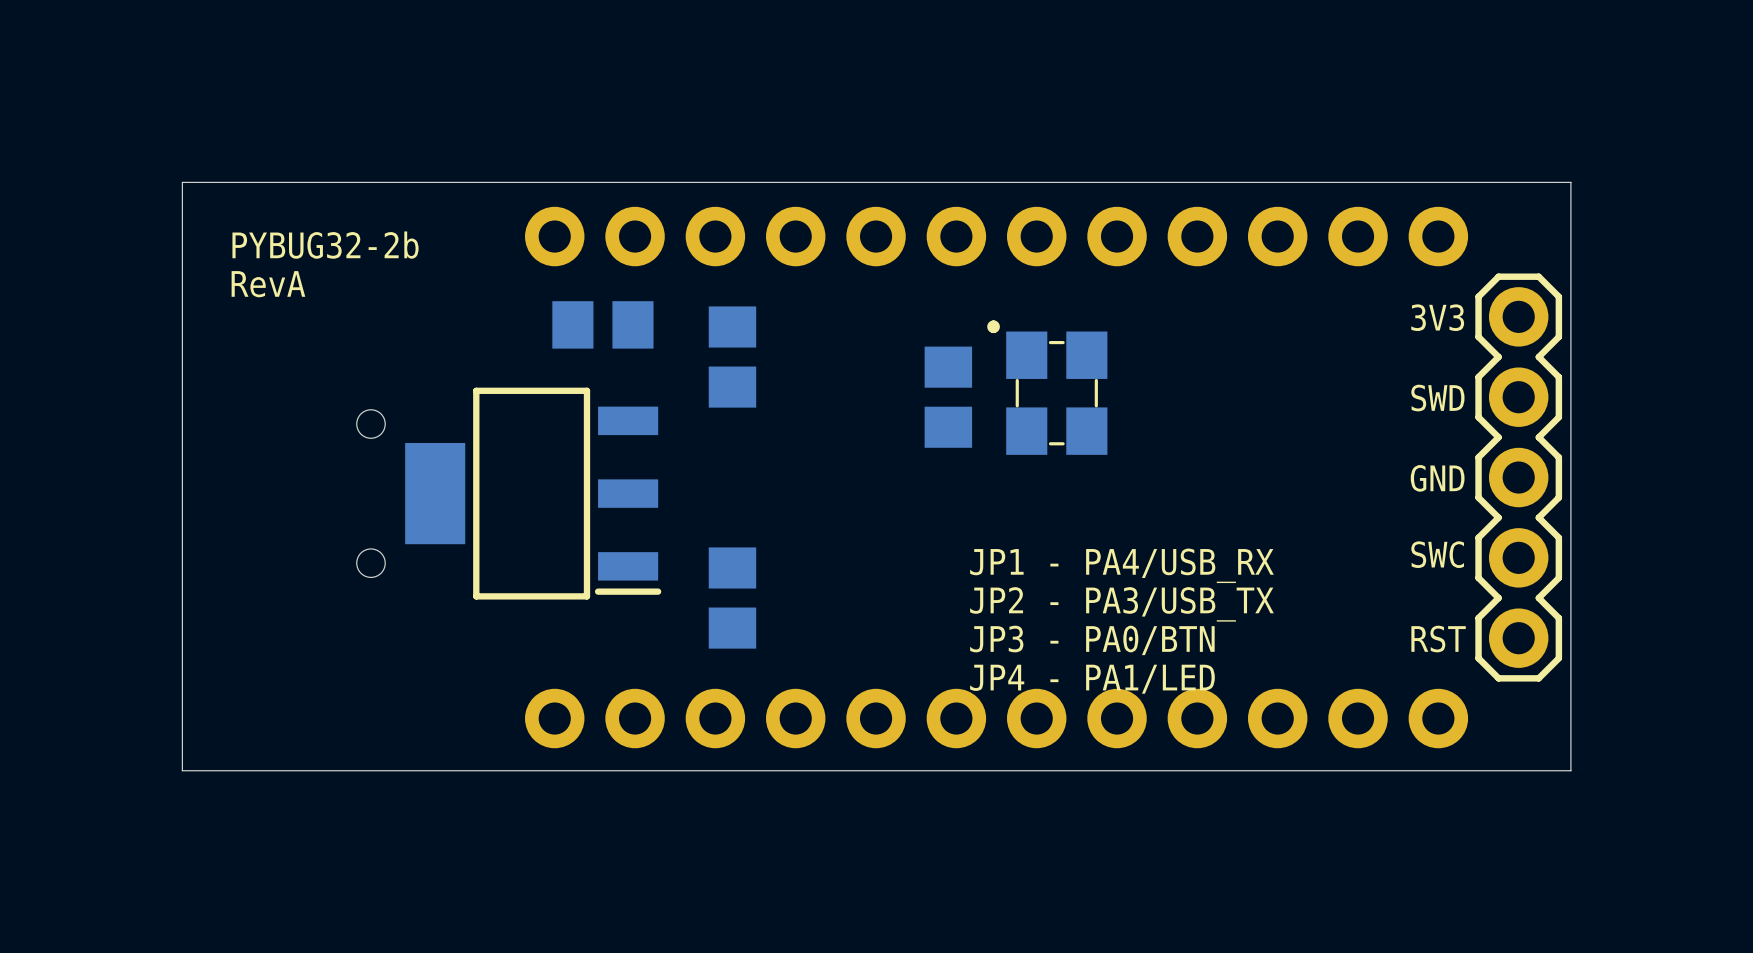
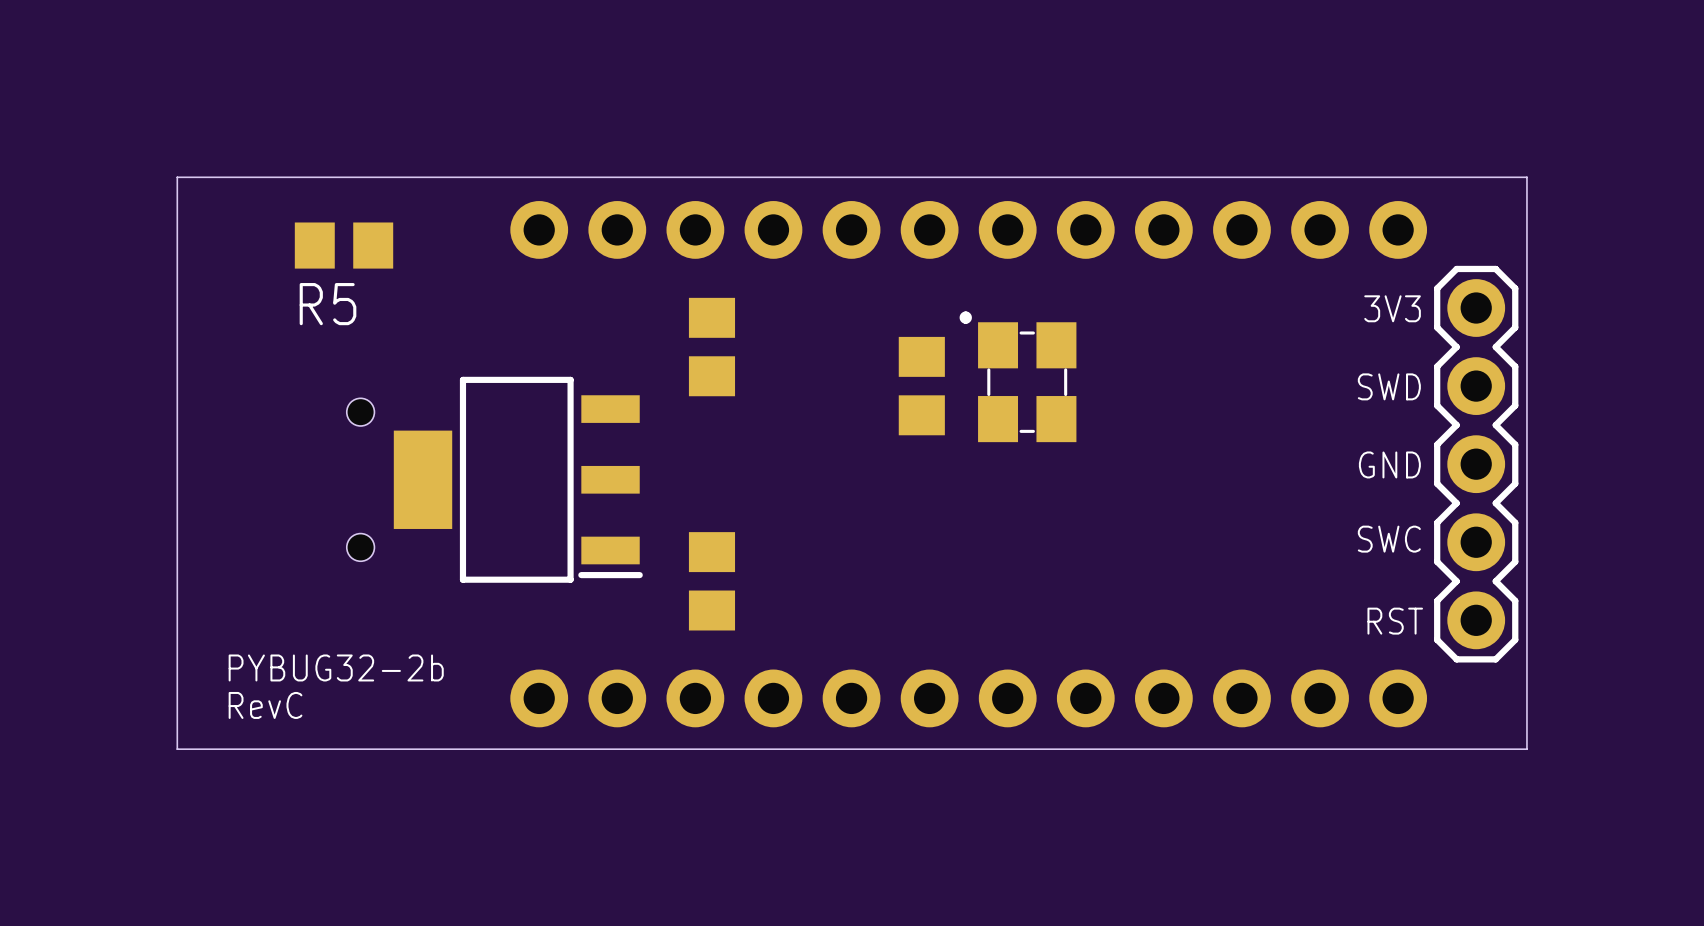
text position: PYBUG32-2b (325, 245) -> PYBUG32-2b (336, 667)
R5: none -> (344, 245)
text: RevA (268, 284) -> none
part: (602, 324) -> none
text: JP1 - PA4/USB_RX (1121, 565) -> none
text: JP2 - PA3/USB_TX (1121, 604) -> none
text: JP3 - PA0/BTN (1092, 640) -> none
text: JP4 - PA1/LED (1092, 679) -> none
text: none -> RevC (265, 705)

